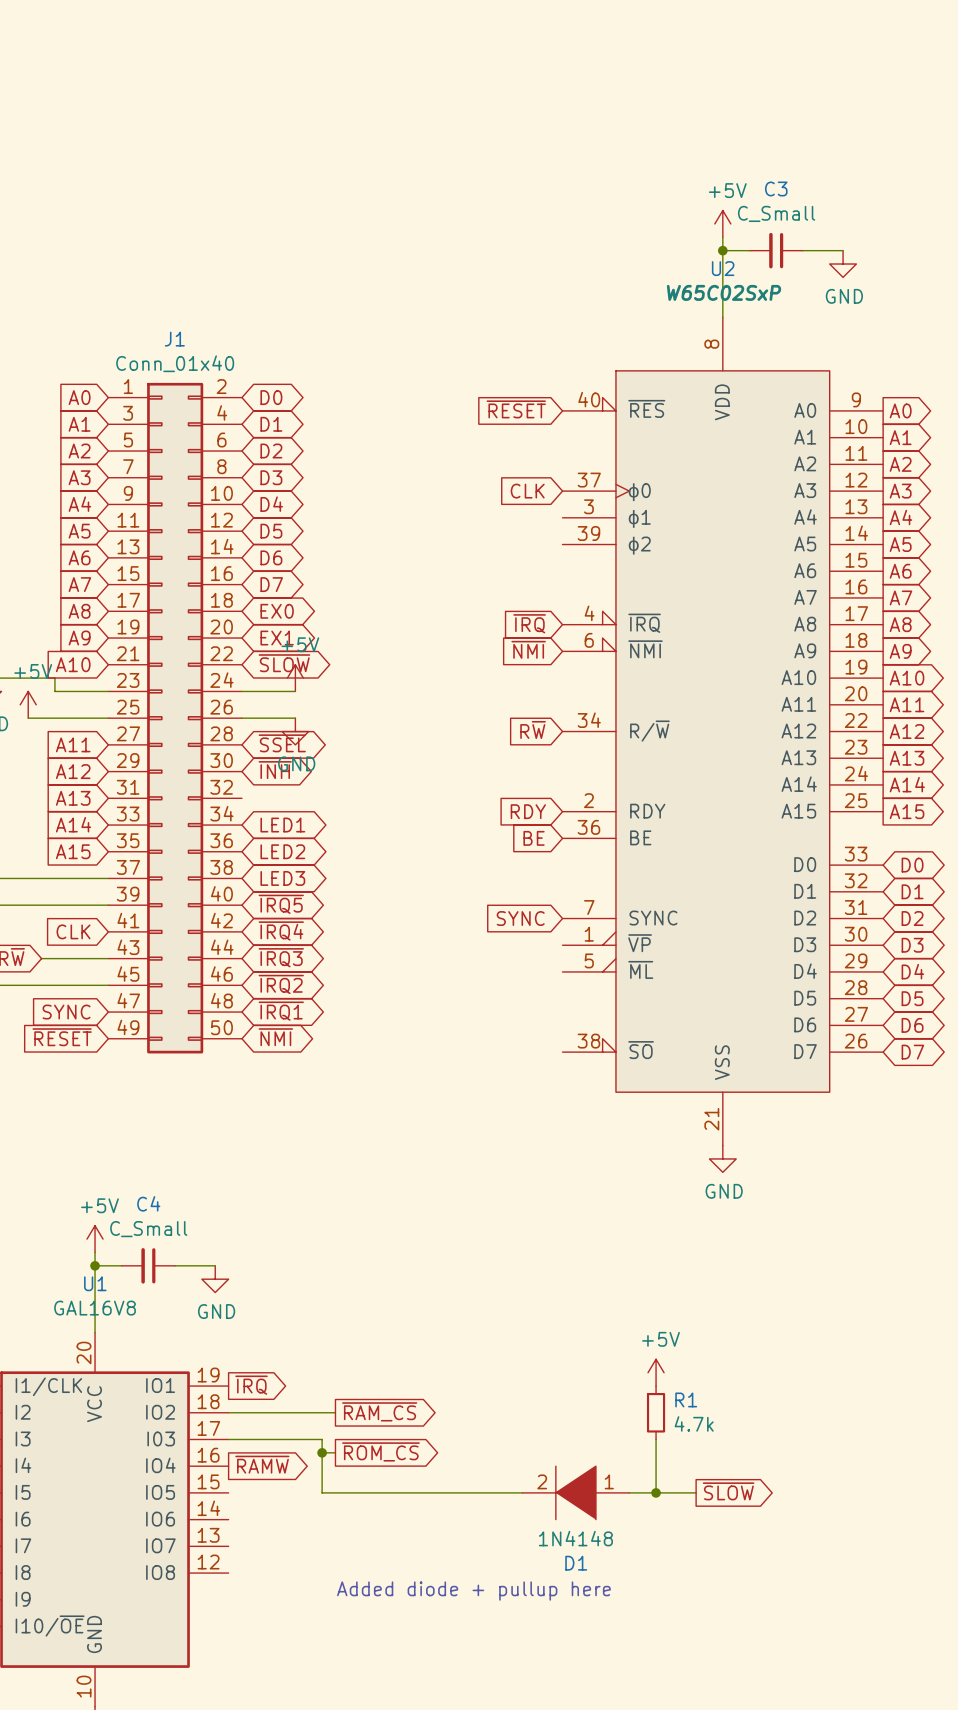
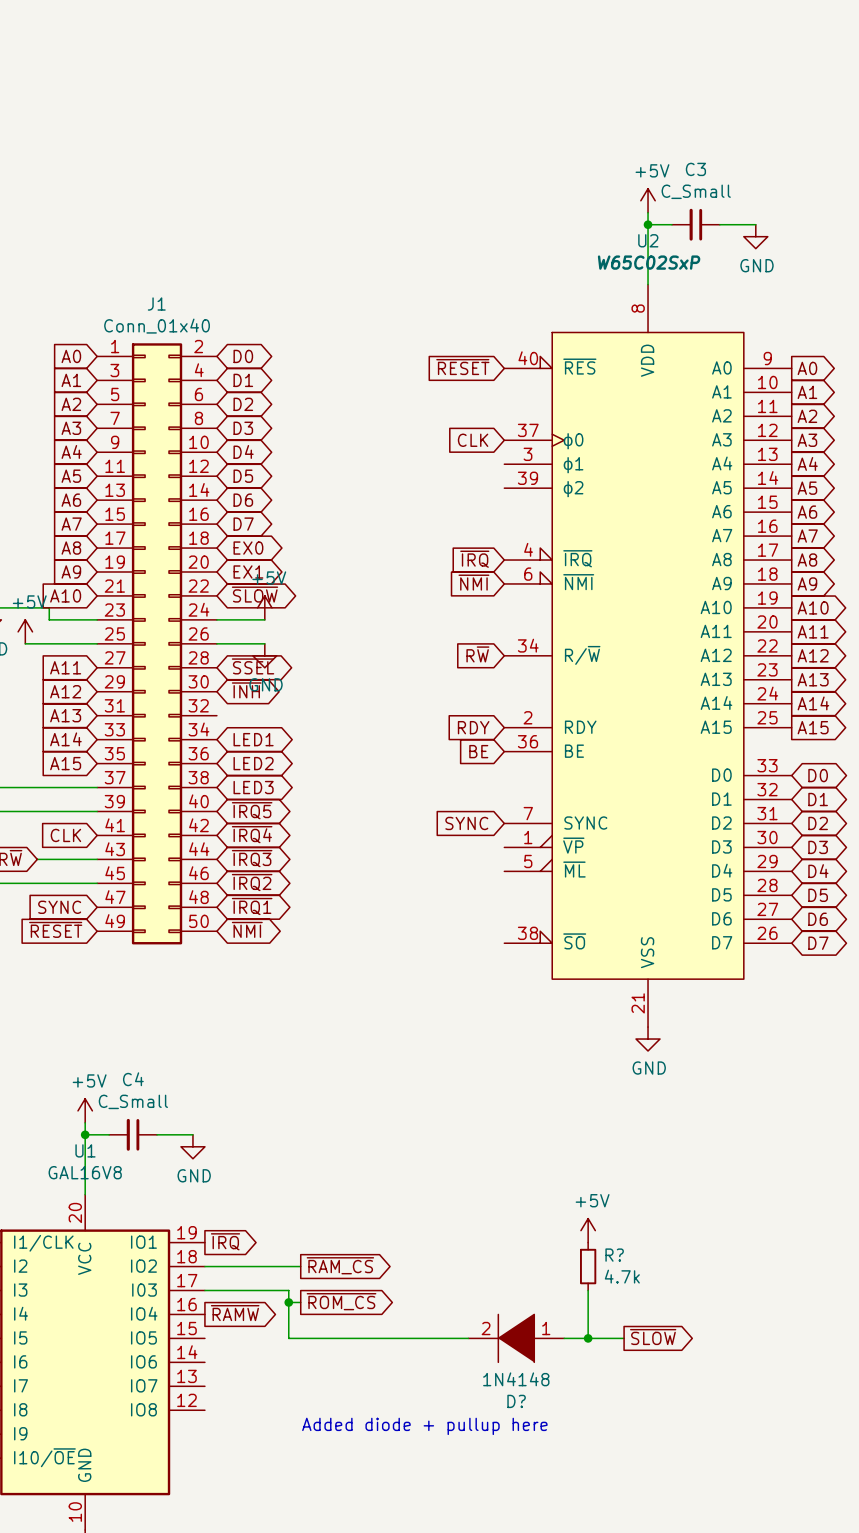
R1 name: R1 (686, 1399) -> R? (614, 1255)
D1 name: D1 (576, 1563) -> D? (516, 1401)

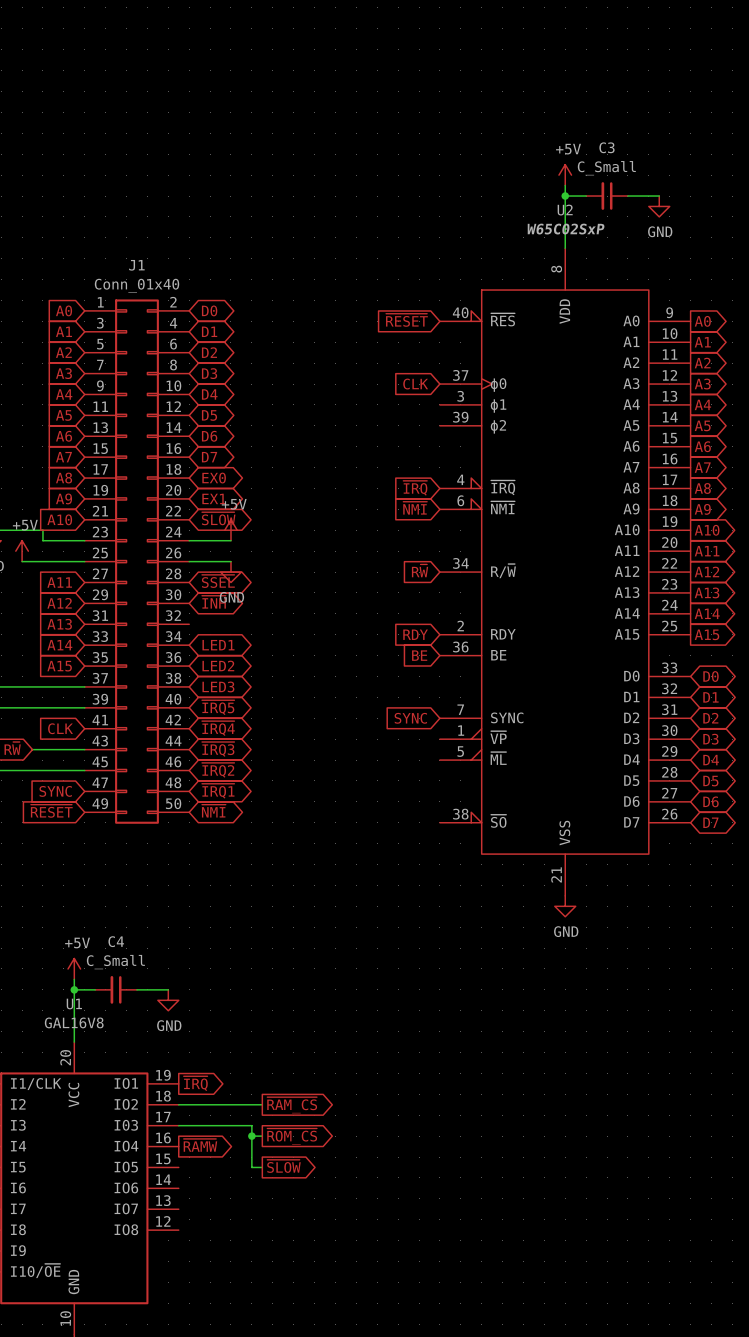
power symbol: +5V (588, 1230) -> none
R?: 4.7k (588, 1266) -> none
wire: (588, 1290) (588, 1338) -> none
global label: none -> ~{SLOW} (283, 1166)
global label: ~{SLOW} (653, 1337) -> none
wire: (300, 1338) (468, 1338) -> none
D?: 1N4148 (516, 1338) -> none
wire: (564, 1338) (624, 1338) -> none
junction: (588, 1338) -> none
text: Added diode + pullup here (424, 1426) -> none

